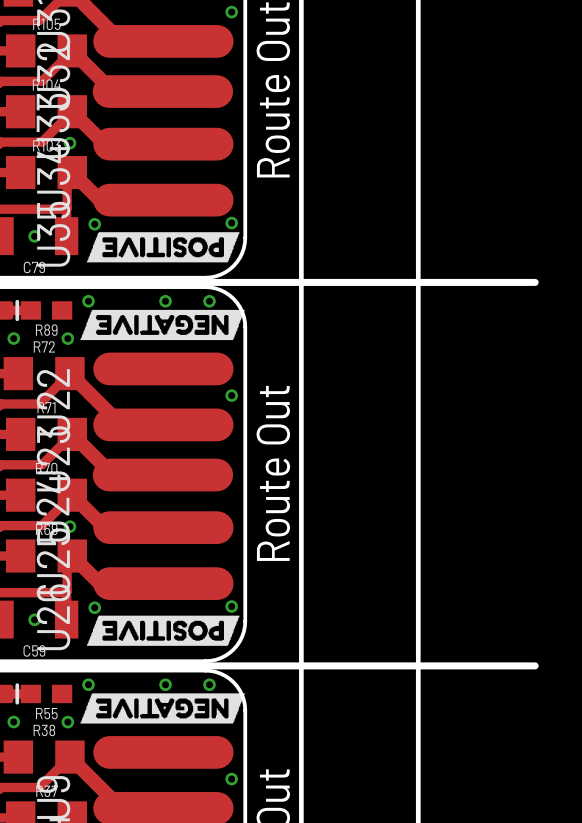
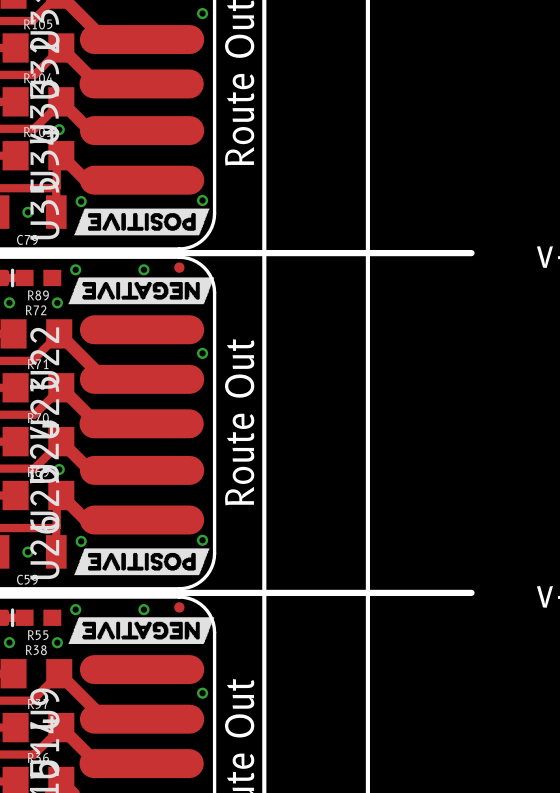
part: none -> (179, 267)
via: (209, 301) -> none
part: none -> (179, 607)
via: (209, 684) -> none

